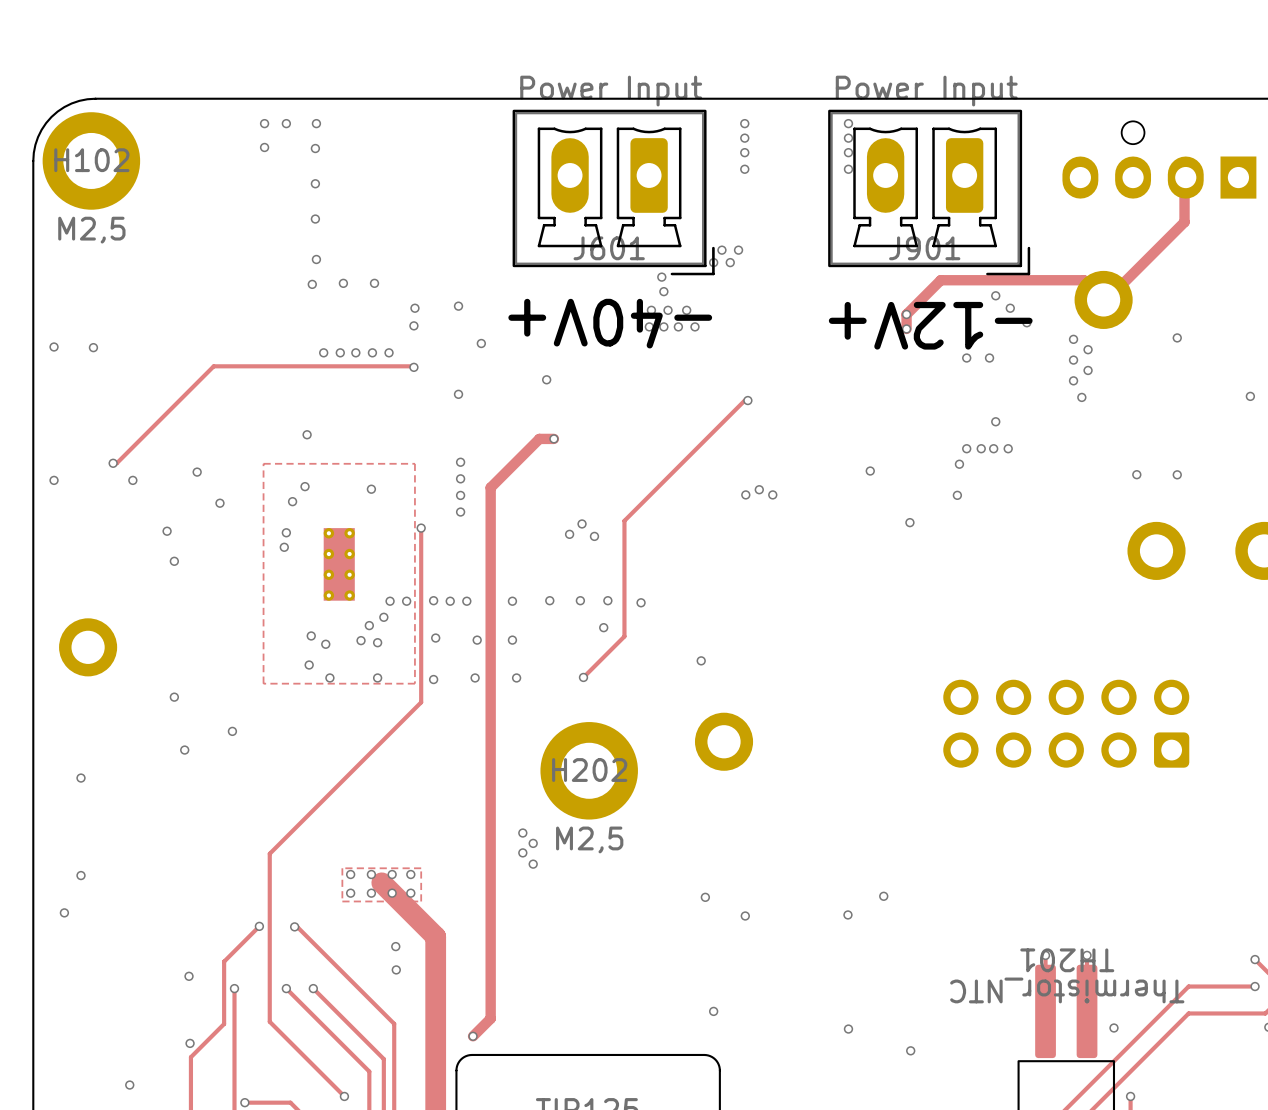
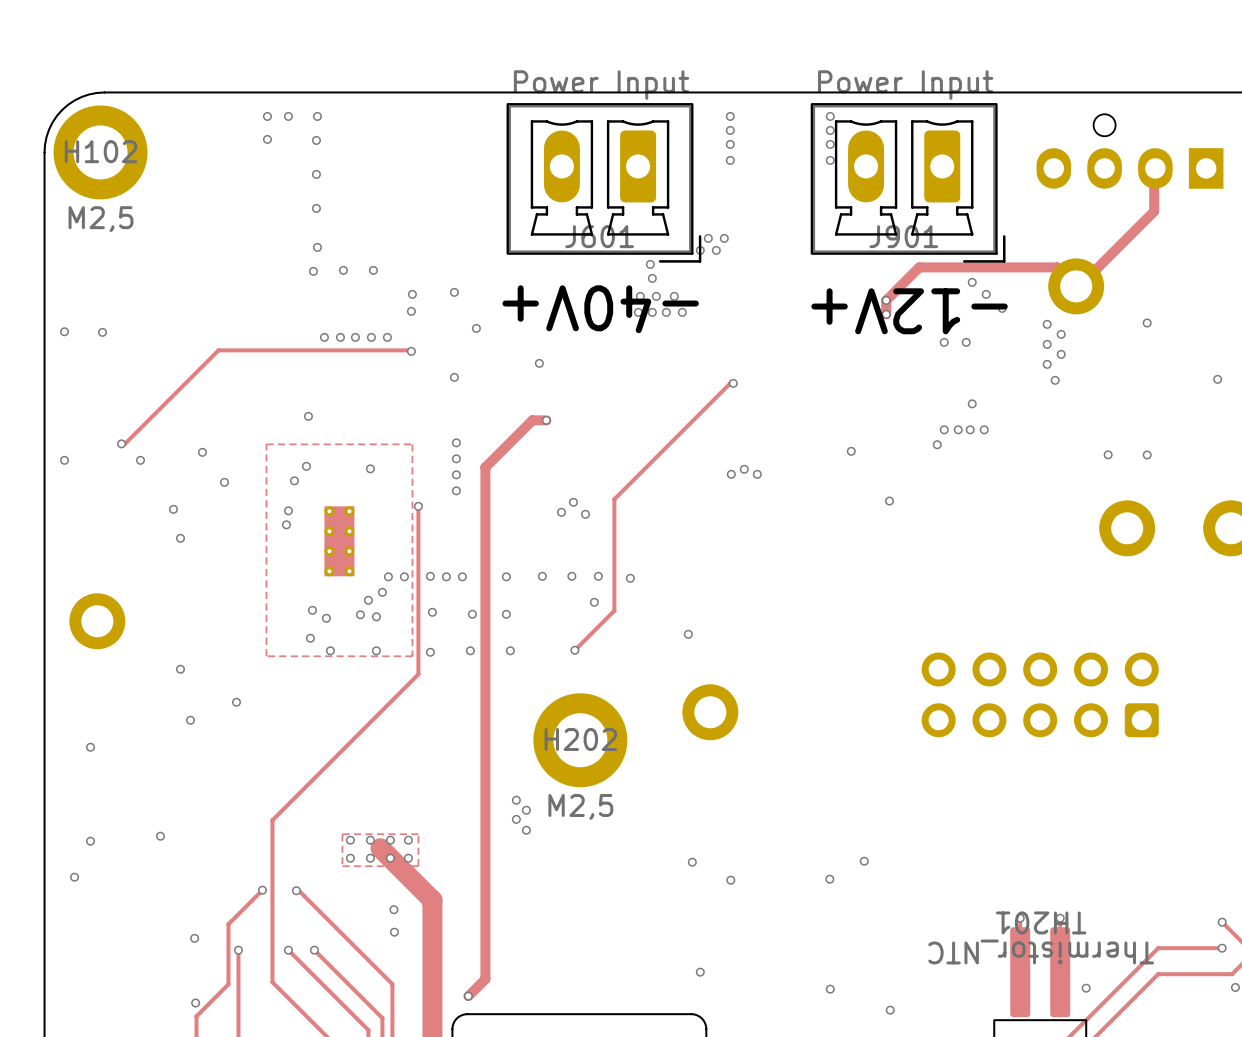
via: (957, 495) -> none
via: none -> (160, 836)

